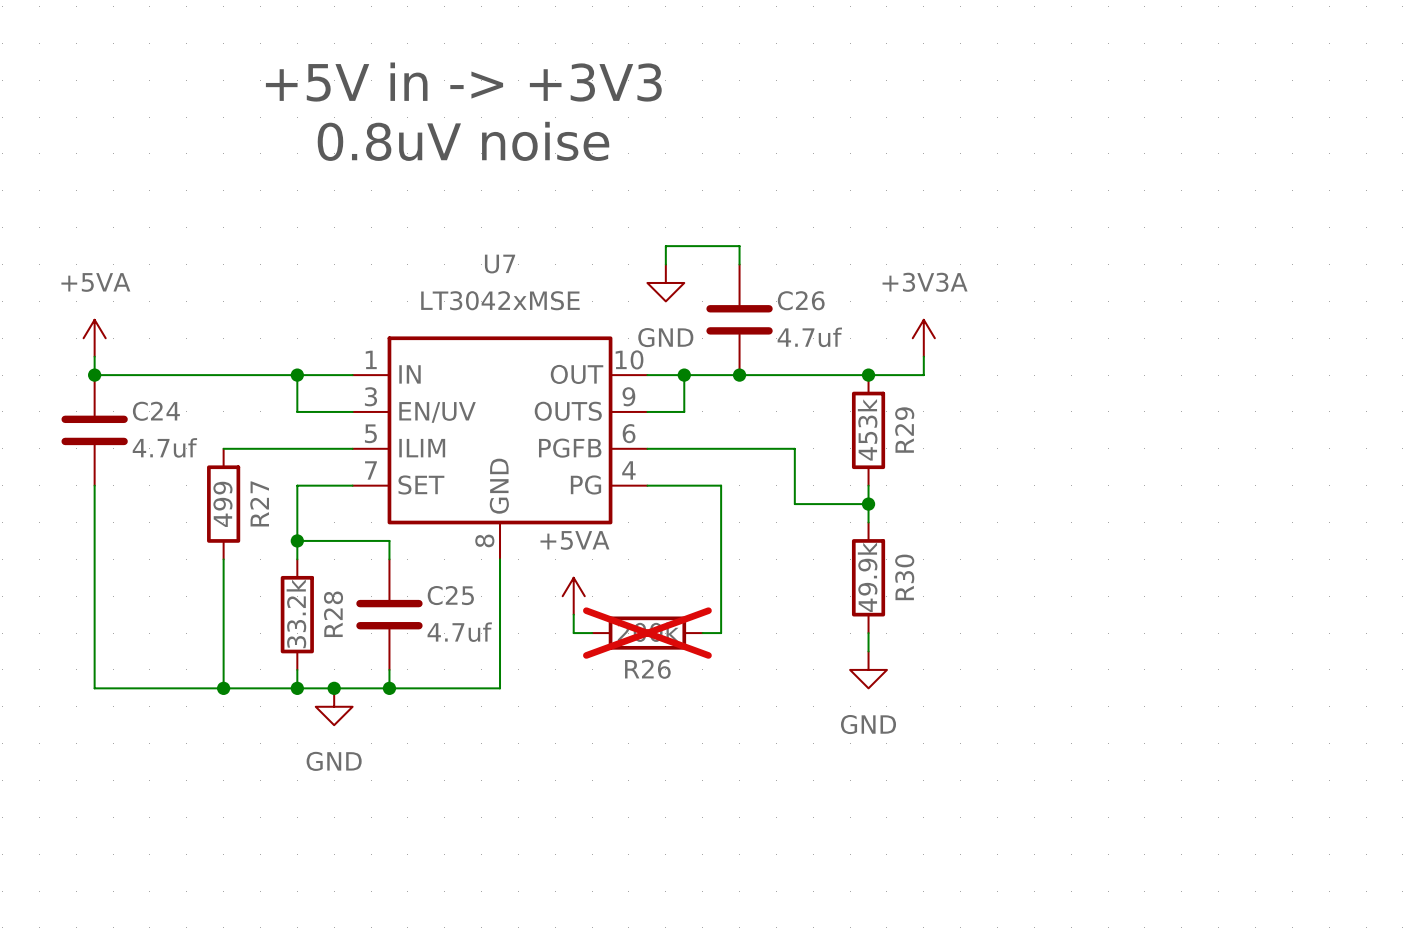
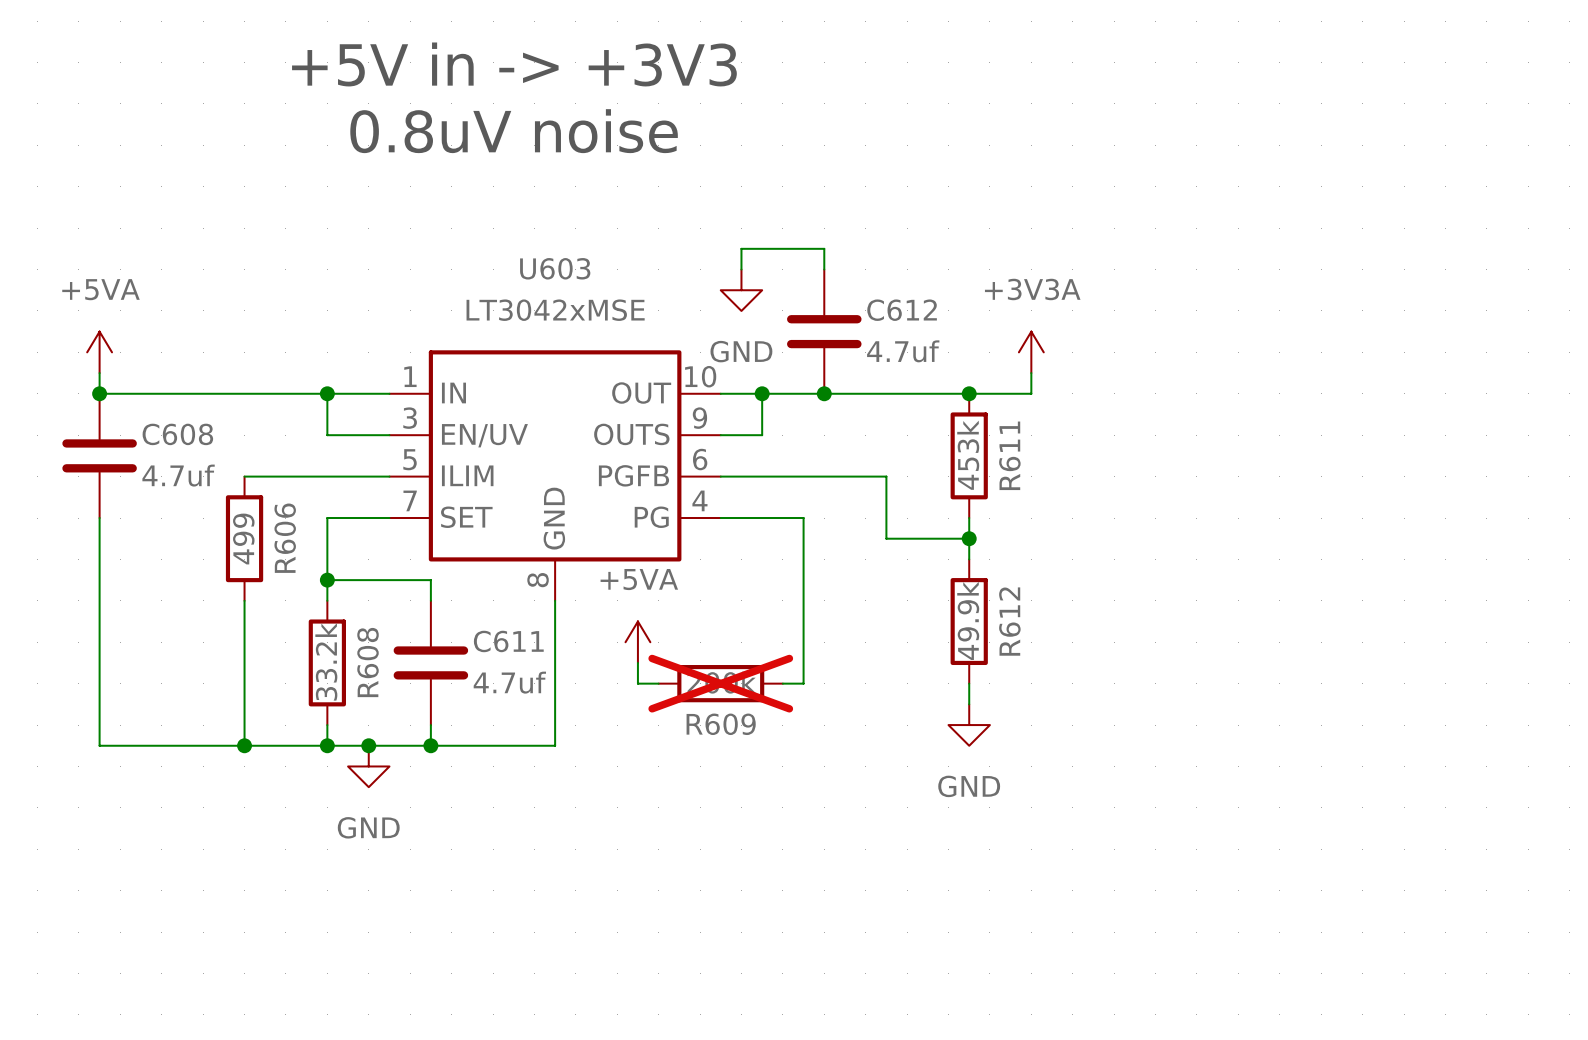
U7 name: U7 (500, 264) -> U603 (555, 268)
C26 name: C26 (801, 300) -> C612 (902, 310)
C24 name: C24 (156, 411) -> C608 (177, 434)
R29 name: R29 (904, 430) -> R611 (1009, 455)
R27 name: R27 (259, 503) -> R606 (285, 538)
R30 name: R30 (904, 577) -> R612 (1009, 621)
C25 name: C25 (450, 595) -> C611 (508, 641)
R28 name: R28 (333, 614) -> R608 (368, 662)
R26 name: R26 (647, 669) -> R609 (721, 724)

